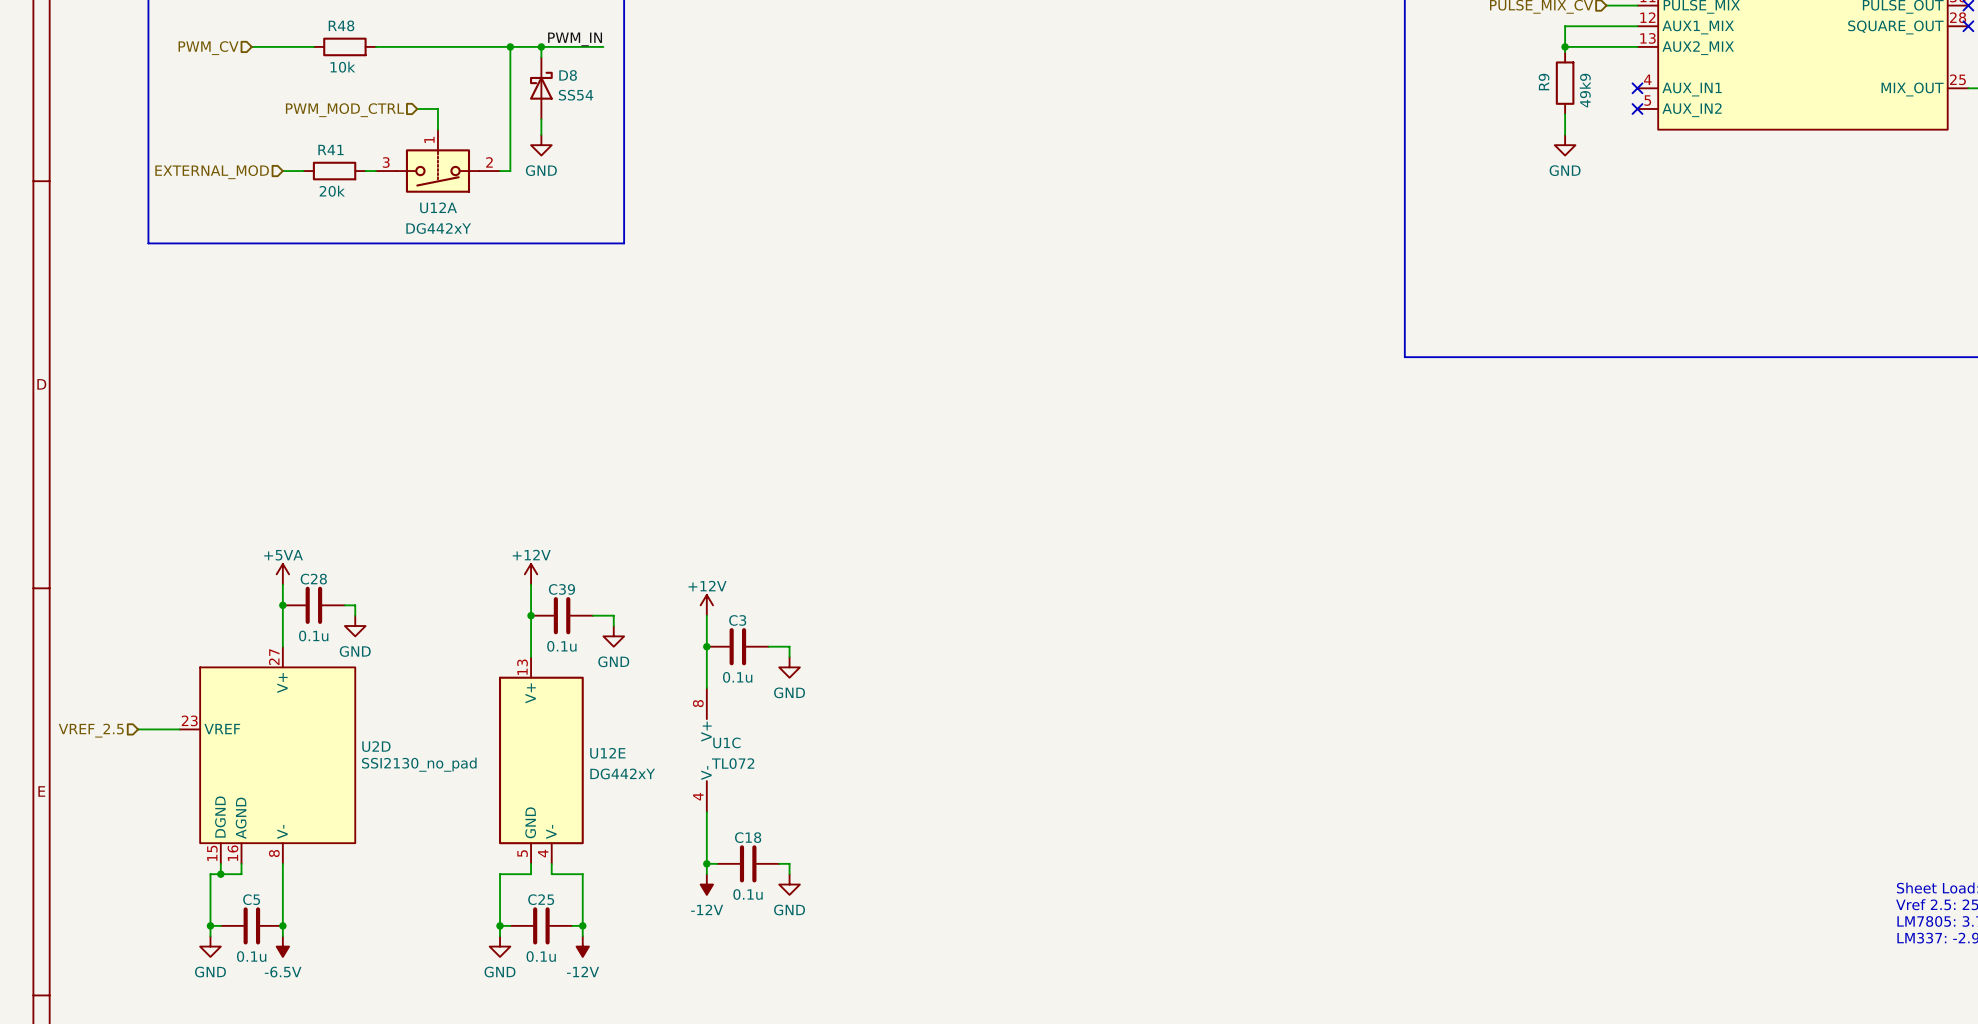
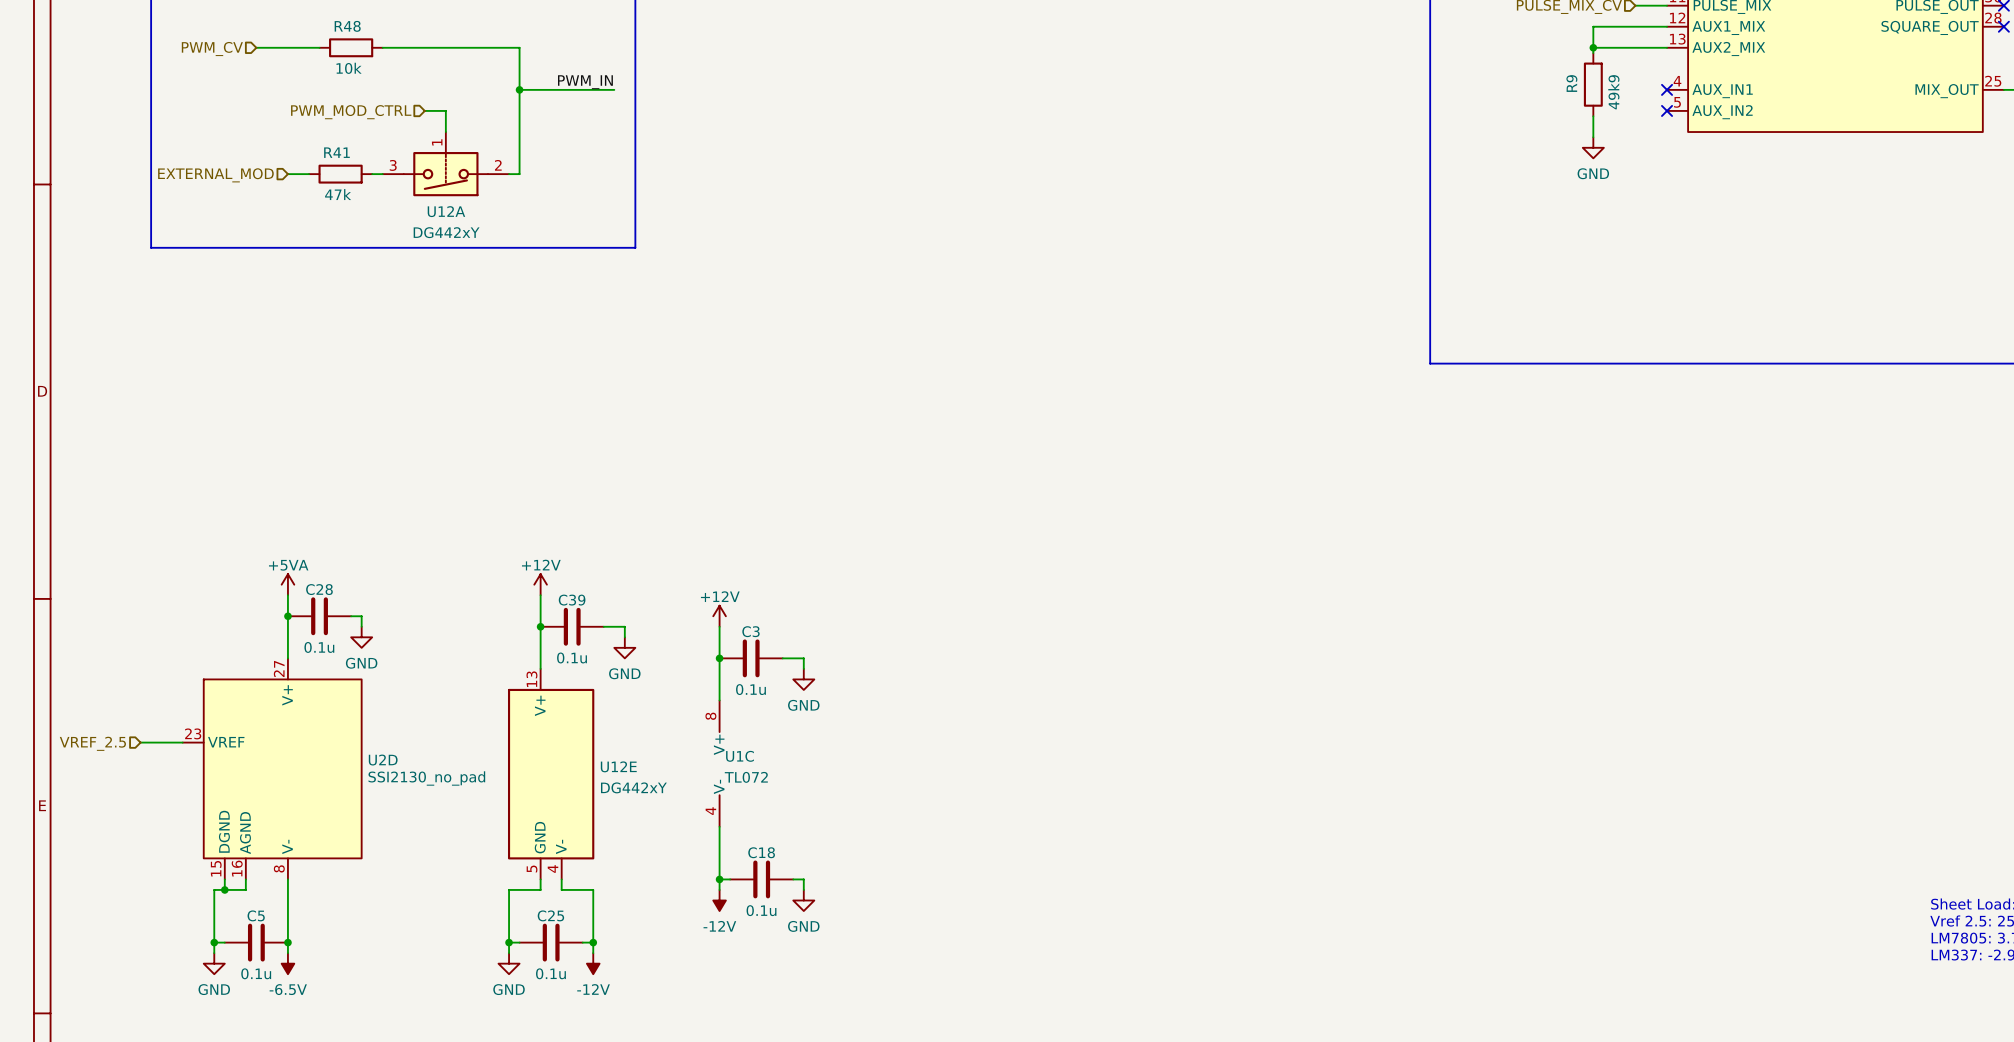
label position: PWM_IN (575, 39) -> PWM_IN (585, 82)
wire: (510, 46) (603, 46) -> (519, 89) (614, 89)
junction: (510, 46) -> none
wire: (541, 46) (541, 57) -> none
junction: (541, 46) -> none
junction: none -> (519, 89)
D8: SS54 (541, 88) -> none
wire: (541, 119) (541, 134) -> none
power symbol: GND (541, 145) -> none
R41 value: 20k (332, 191) -> 47k (338, 194)

